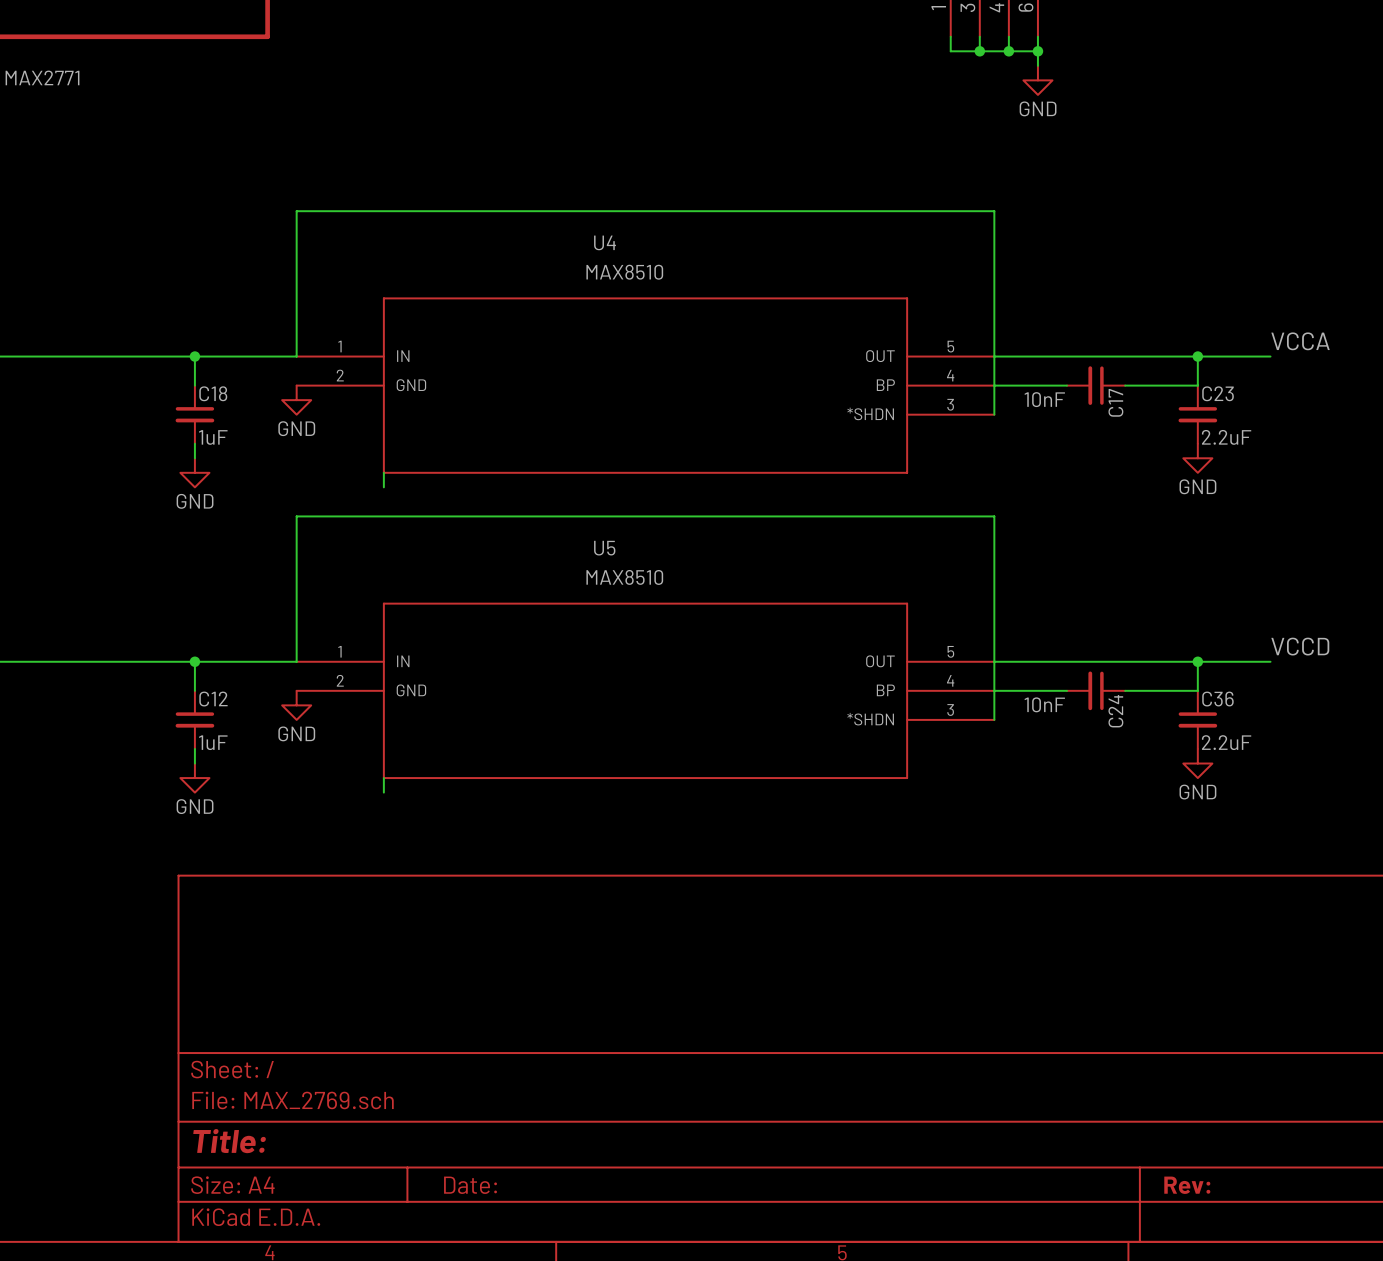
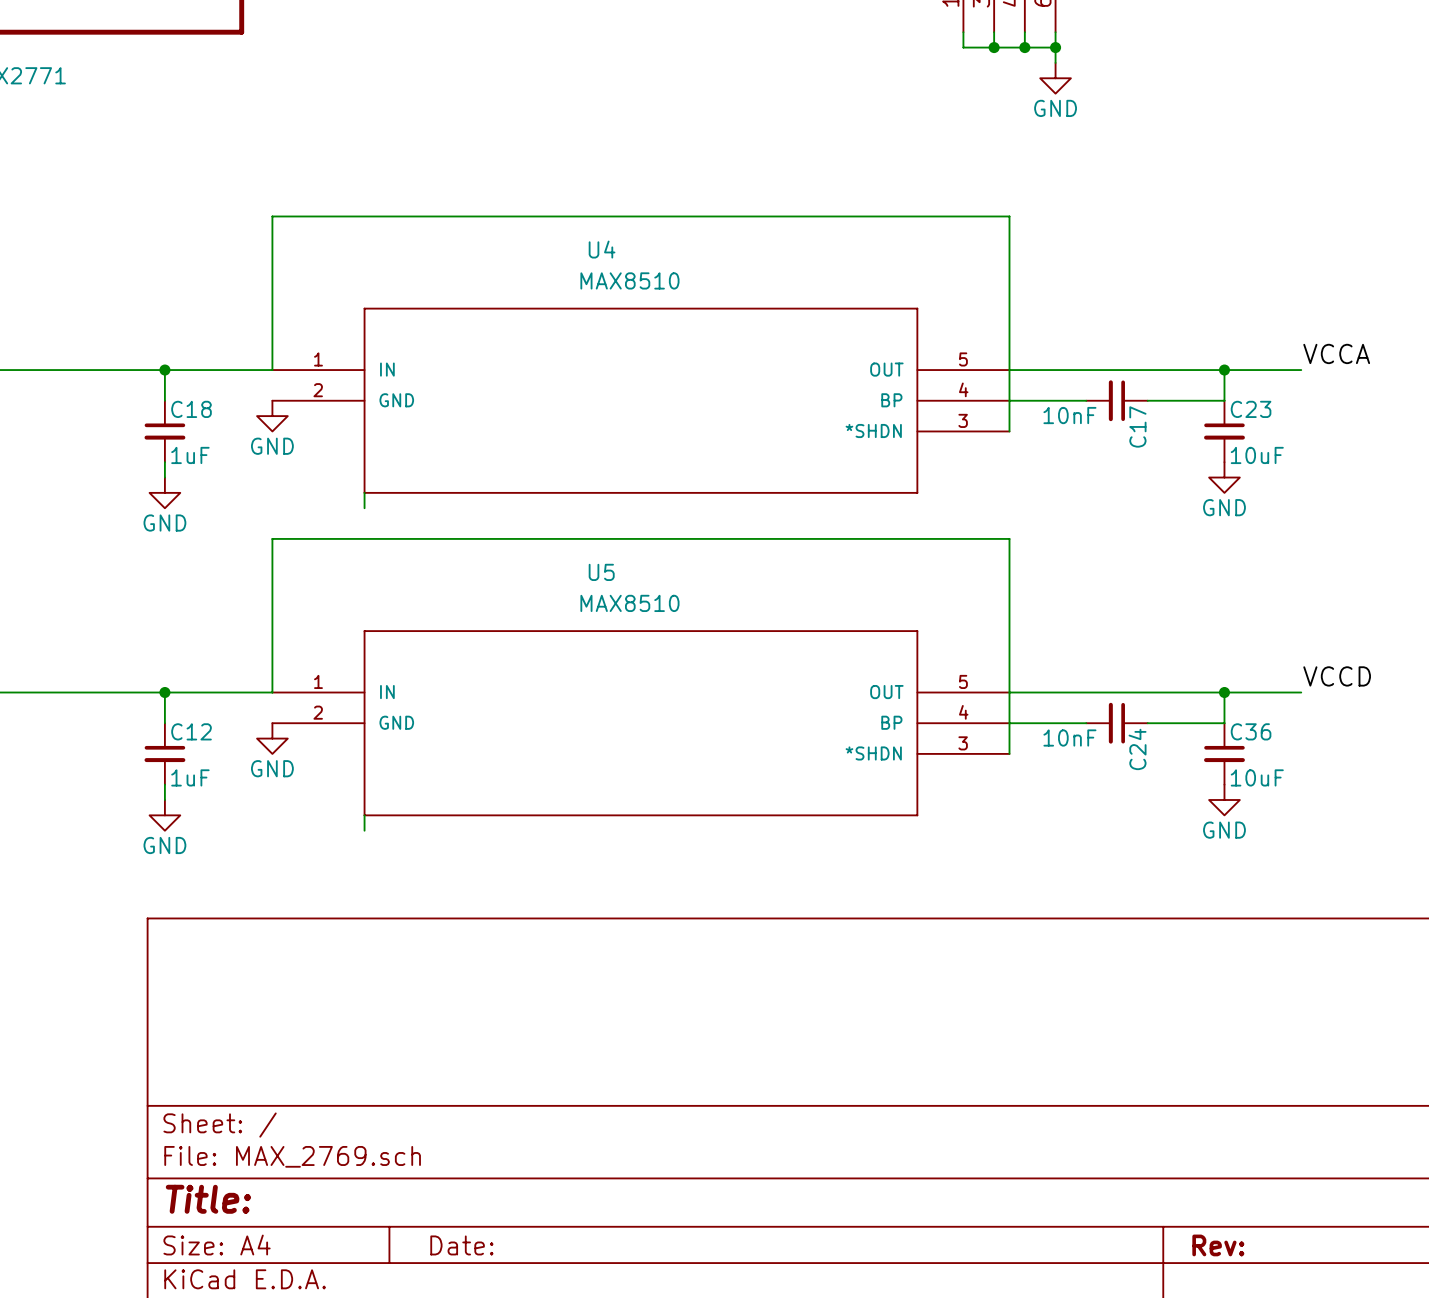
C23 value: 2.2uF (1226, 437) -> 10uF (1257, 455)
C36 value: 2.2uF (1226, 742) -> 10uF (1257, 777)

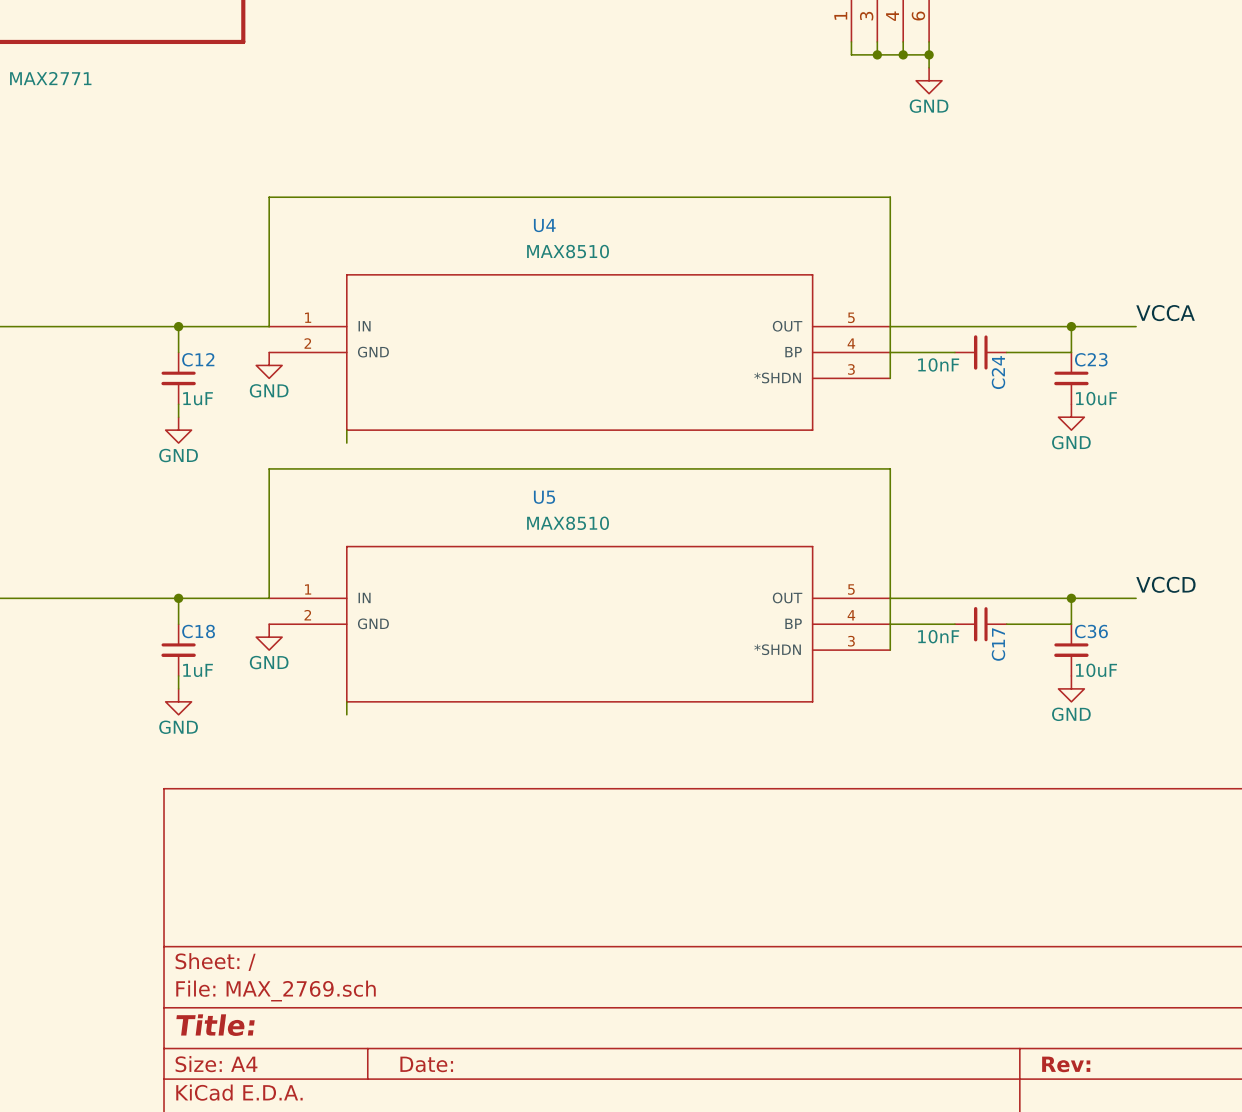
C18 name: C18 (191, 409) -> C12 (198, 359)
C17 name: C17 (1137, 426) -> C24 (998, 372)
C12 name: C12 (191, 731) -> C18 (198, 631)
C24 name: C24 (1137, 749) -> C17 (998, 644)

